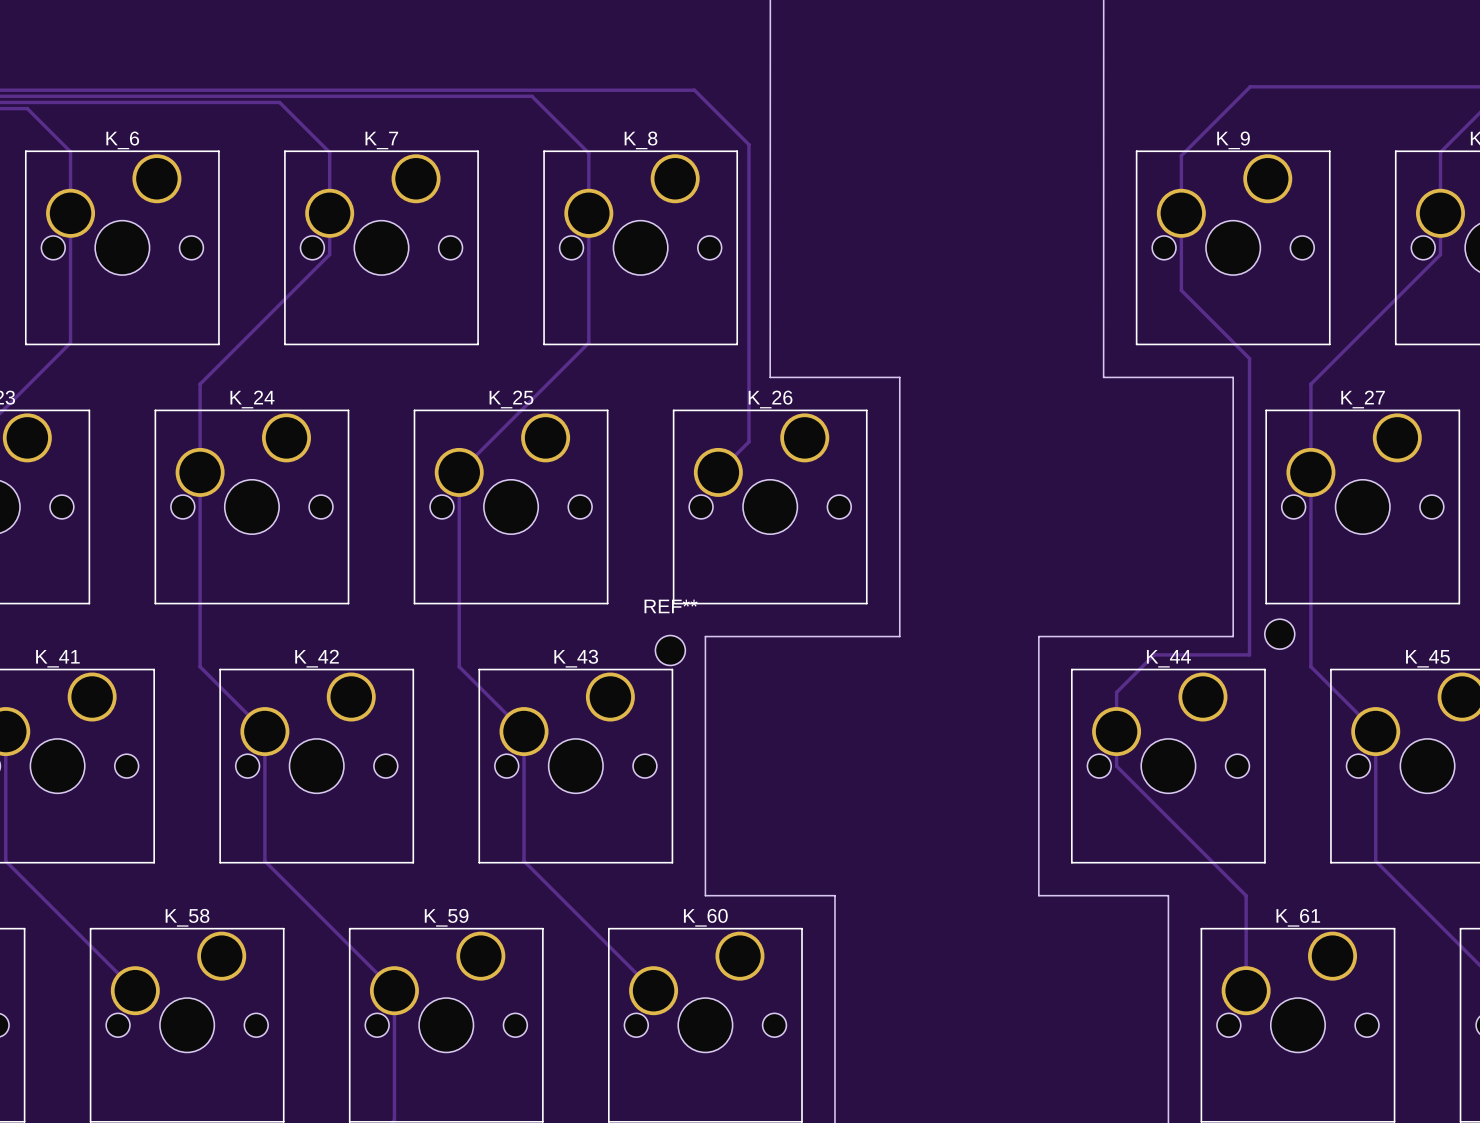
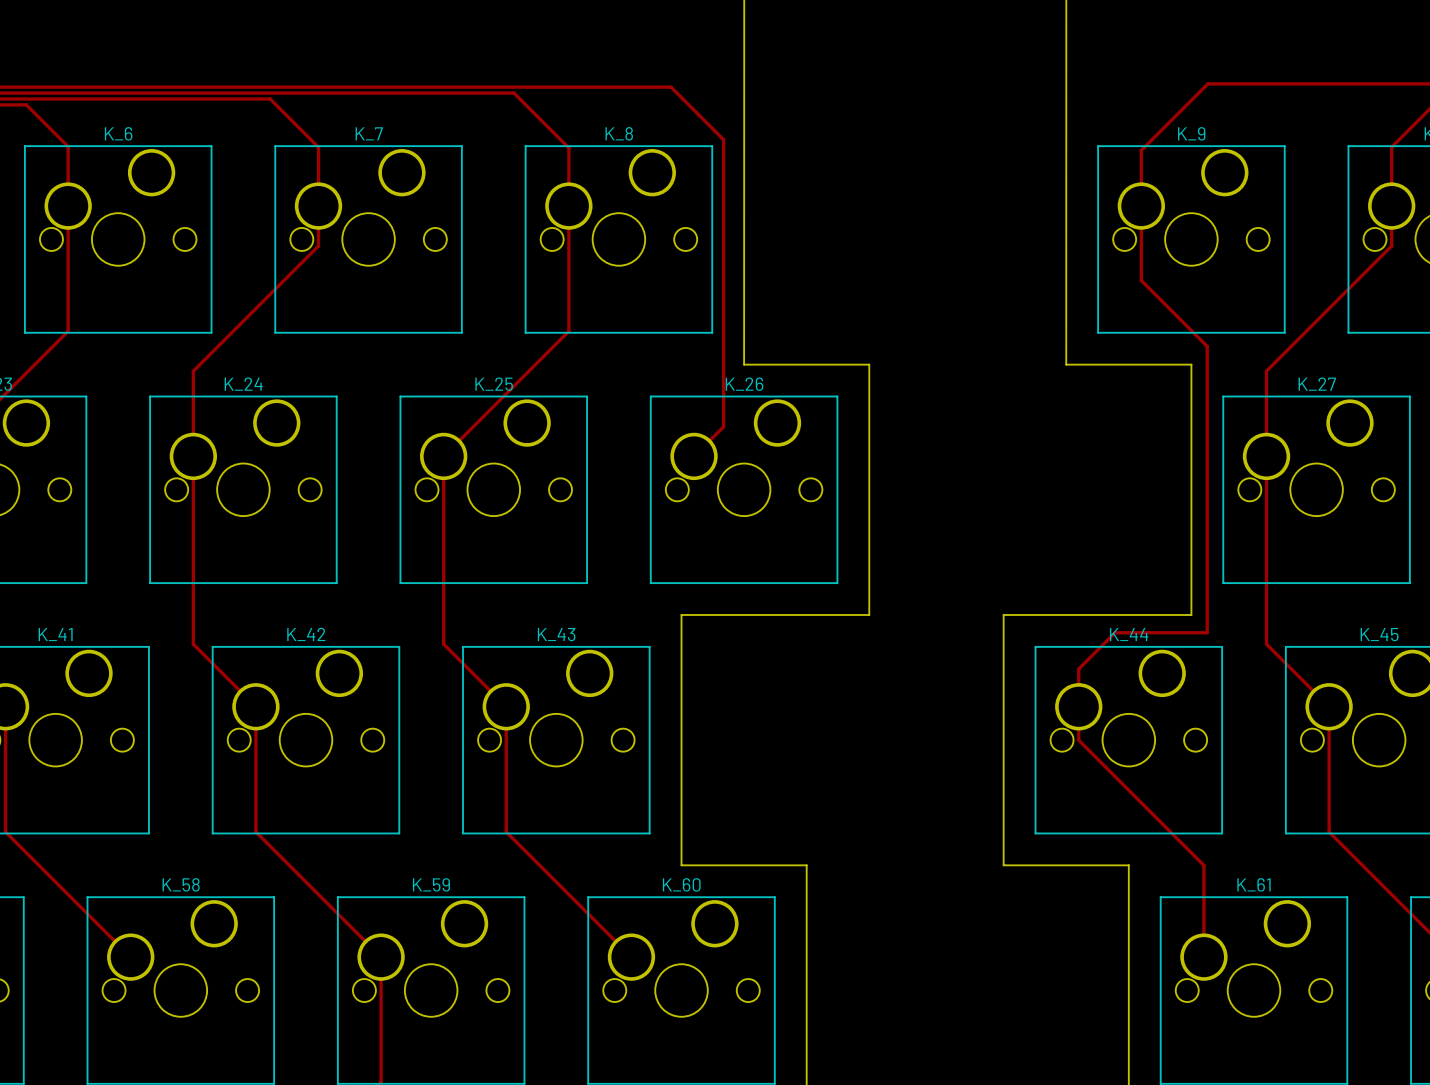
part: (1279, 634) -> none
REF**: (670, 650) -> none

